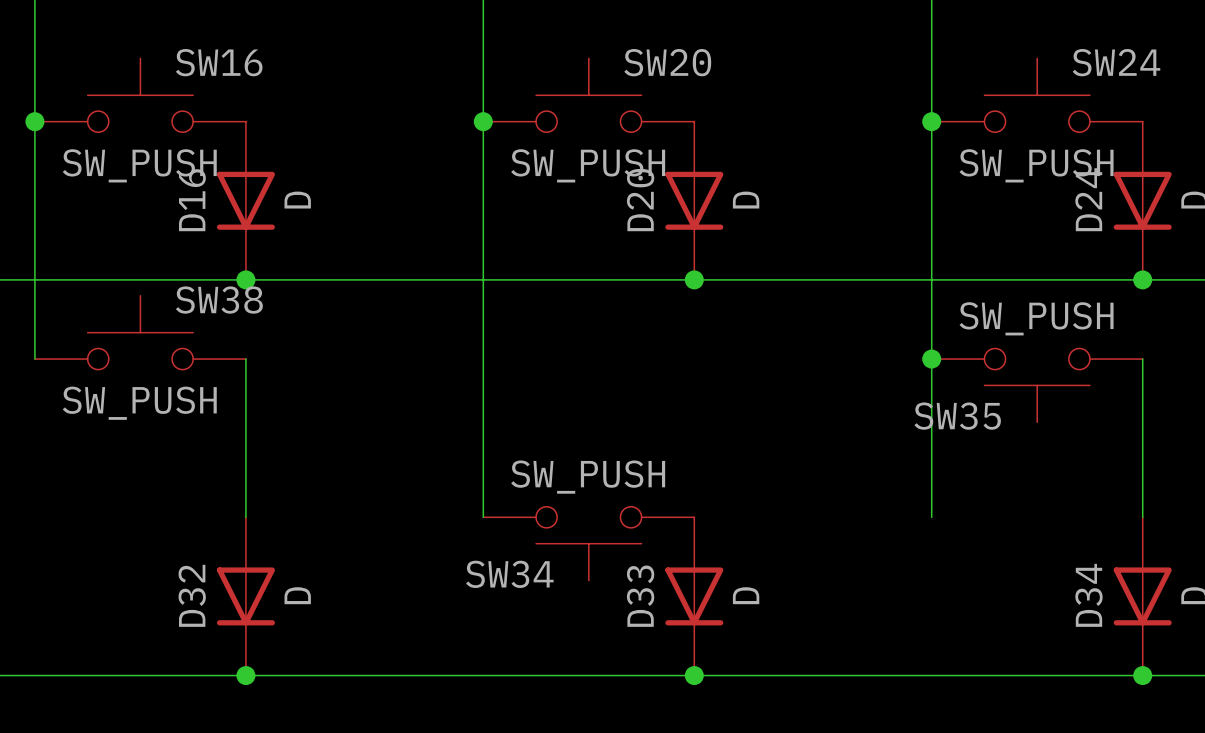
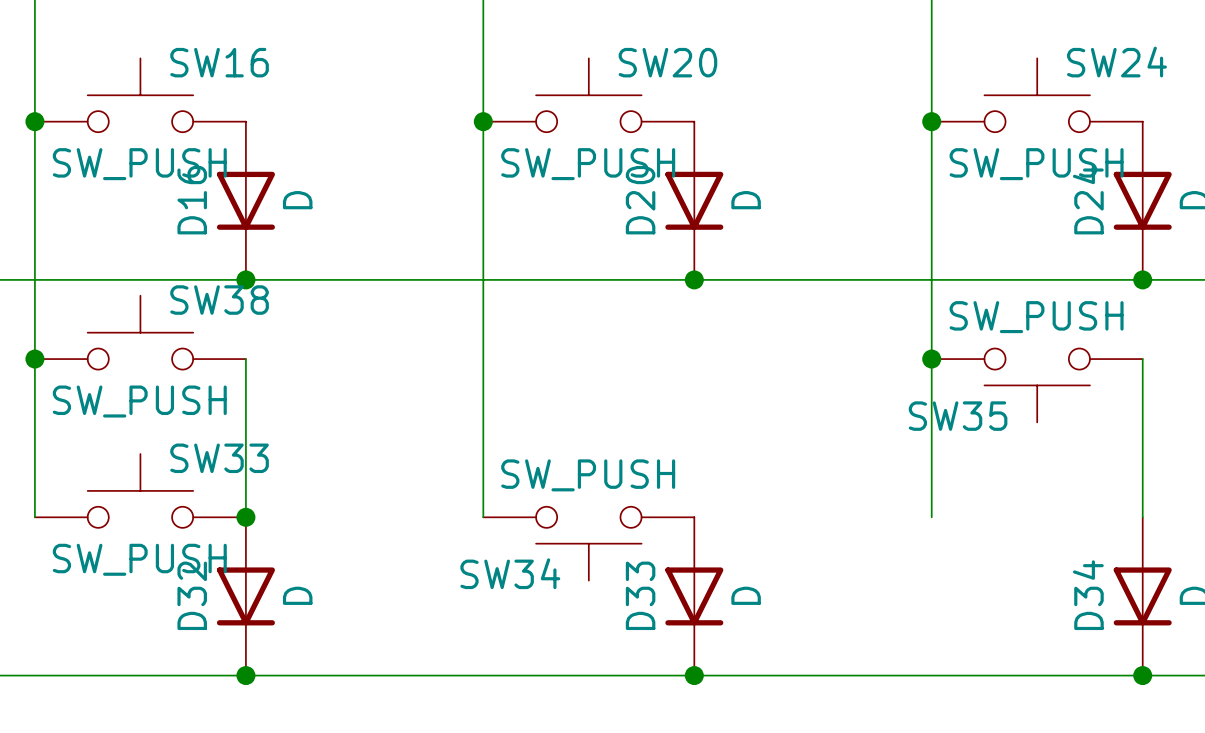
wire: none -> (34, 359) (34, 517)
junction: none -> (34, 359)
SW33: none -> SW_PUSH (140, 490)
junction: none -> (245, 517)

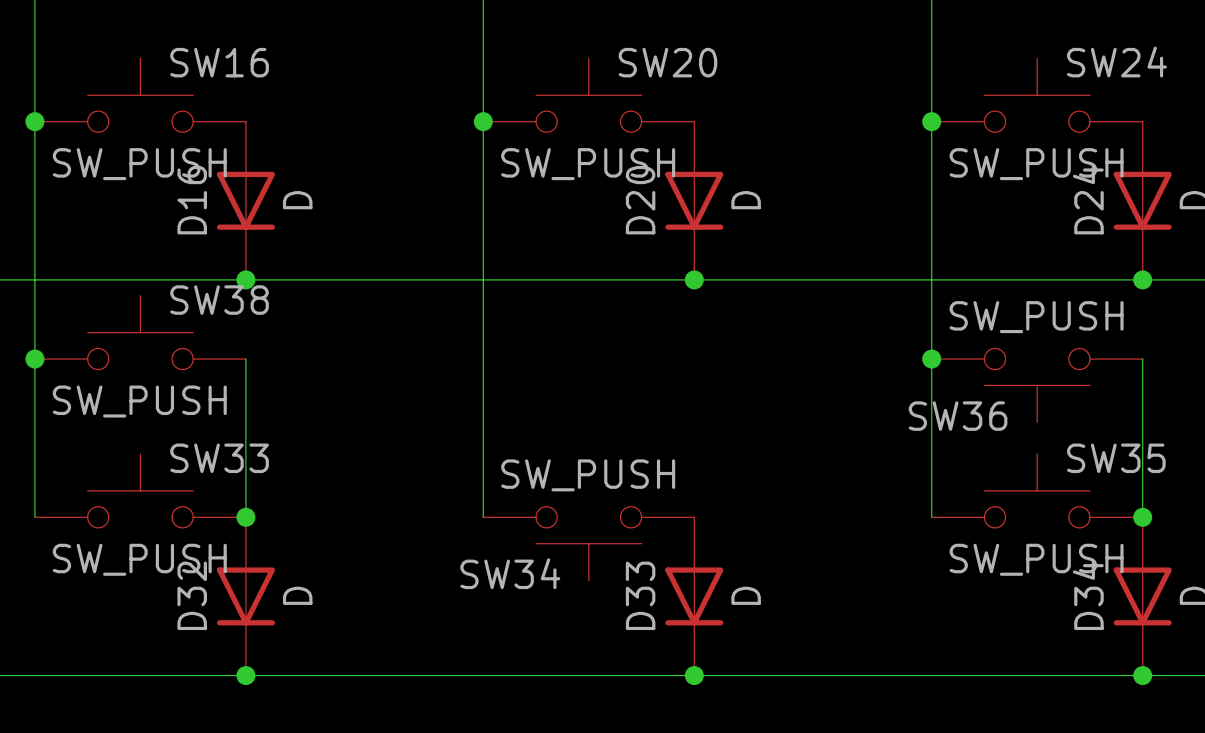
SW35 name: SW35 (958, 416) -> SW36 (958, 416)
SW35: none -> SW_PUSH (1037, 490)
junction: none -> (1142, 517)

